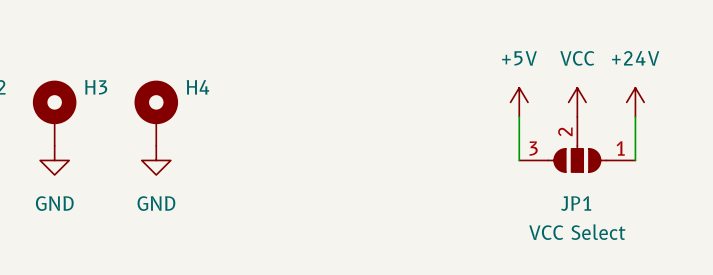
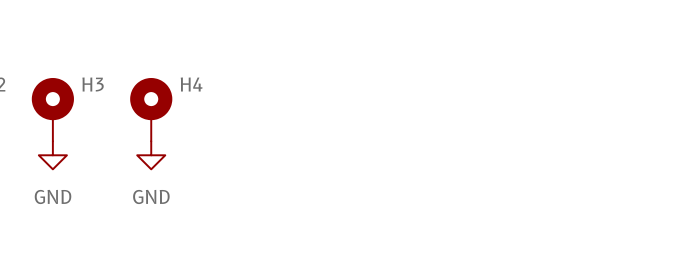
power symbol: +5V (519, 102) -> none
power symbol: VCC (577, 102) -> none
power symbol: +24V (635, 102) -> none
wire: (519, 116) (519, 160) -> none
wire: (635, 116) (635, 160) -> none
JP1: VCC Select (577, 144) -> none

